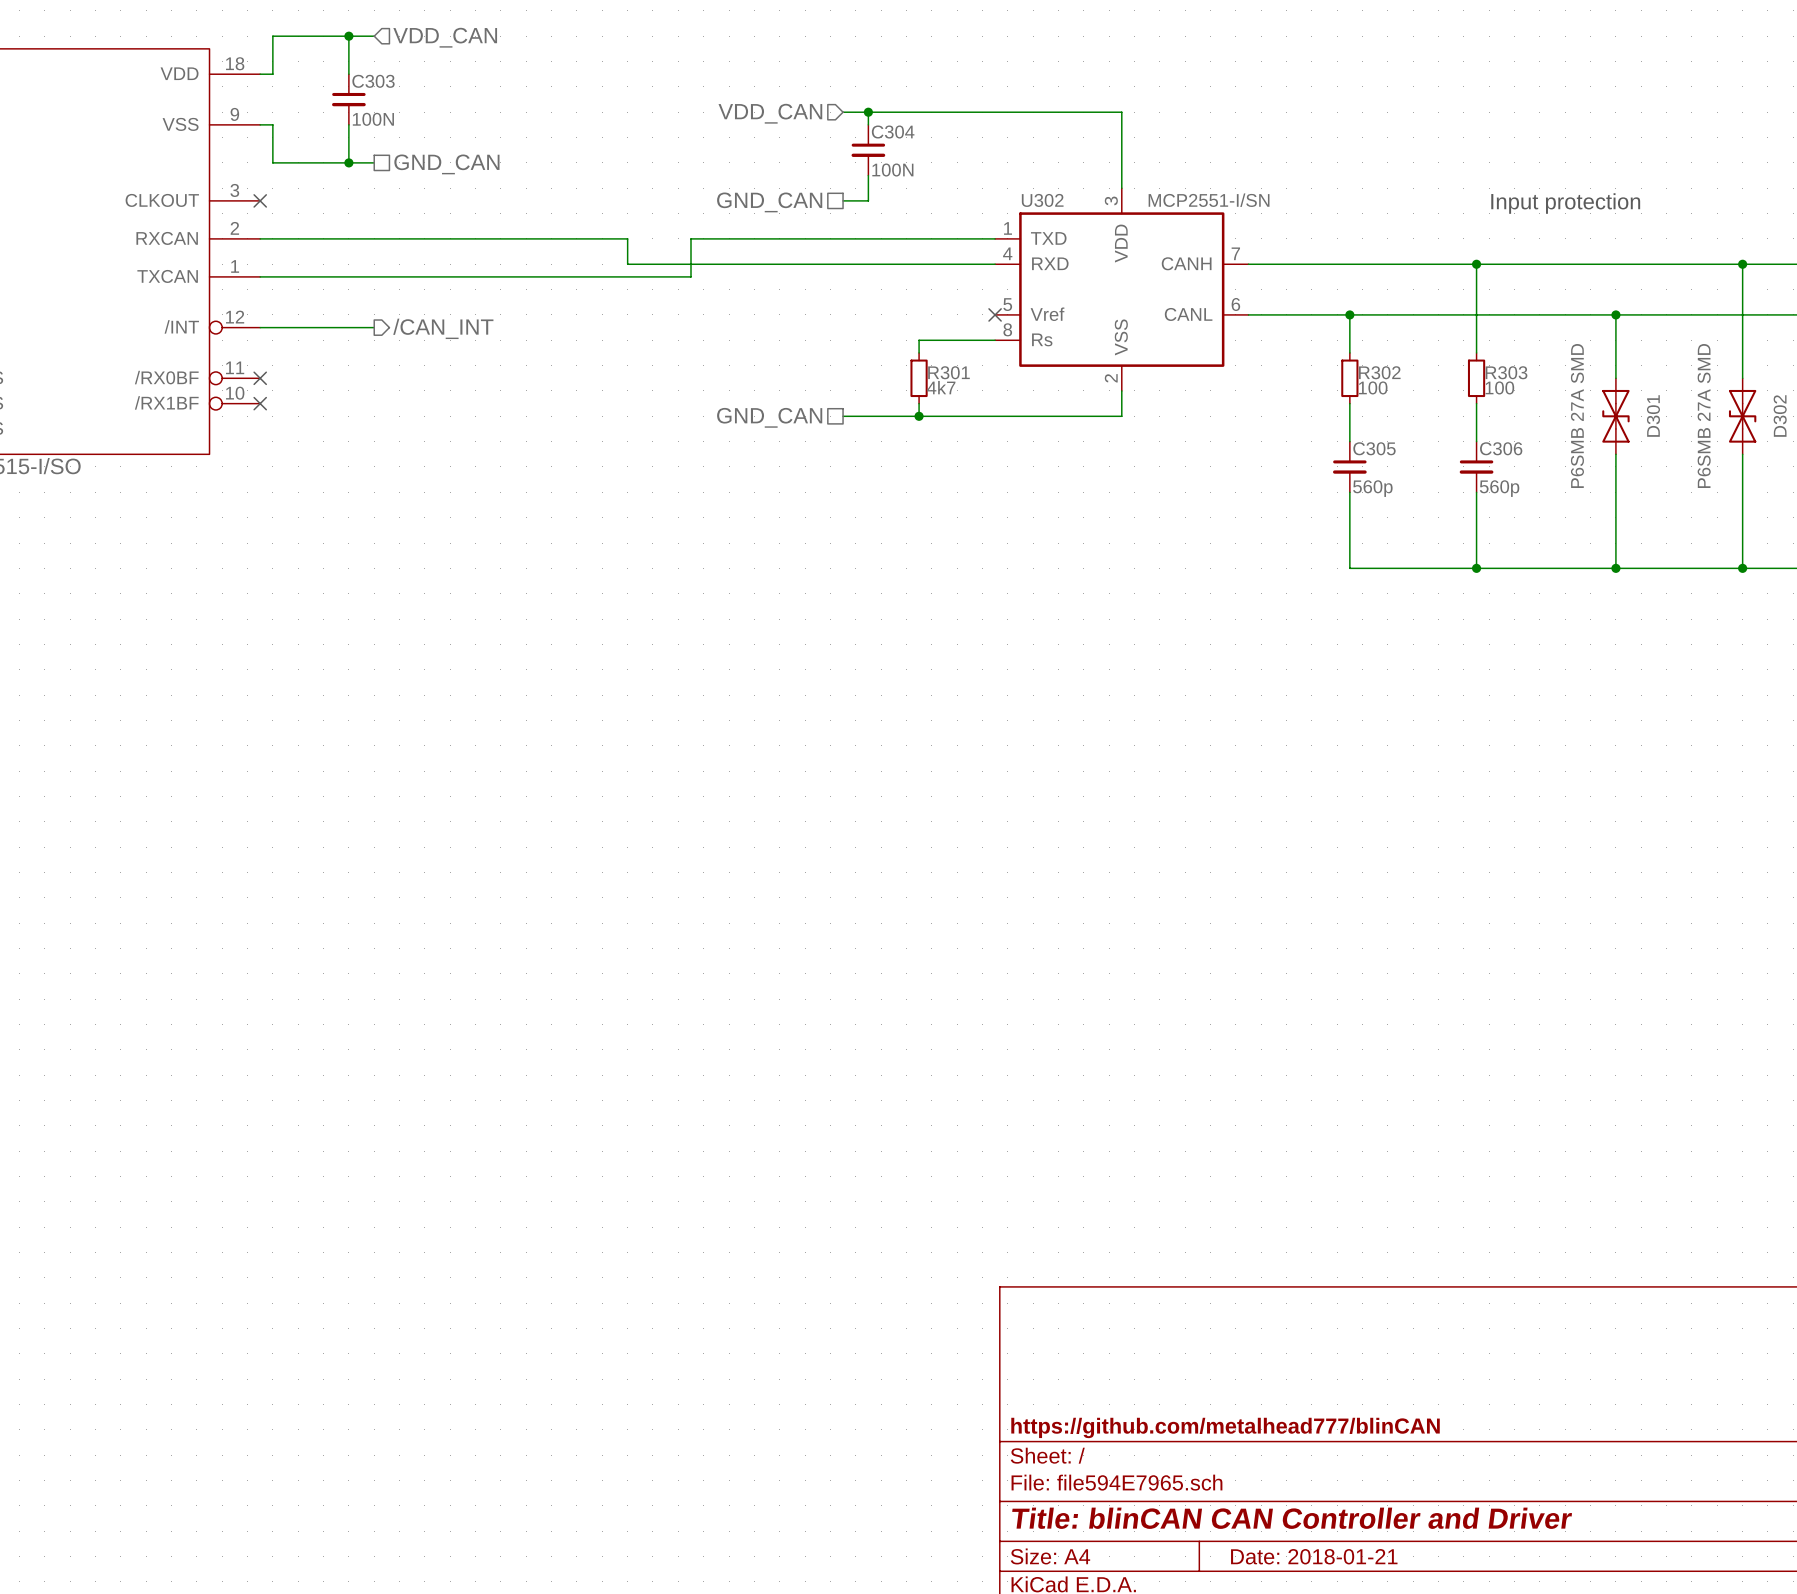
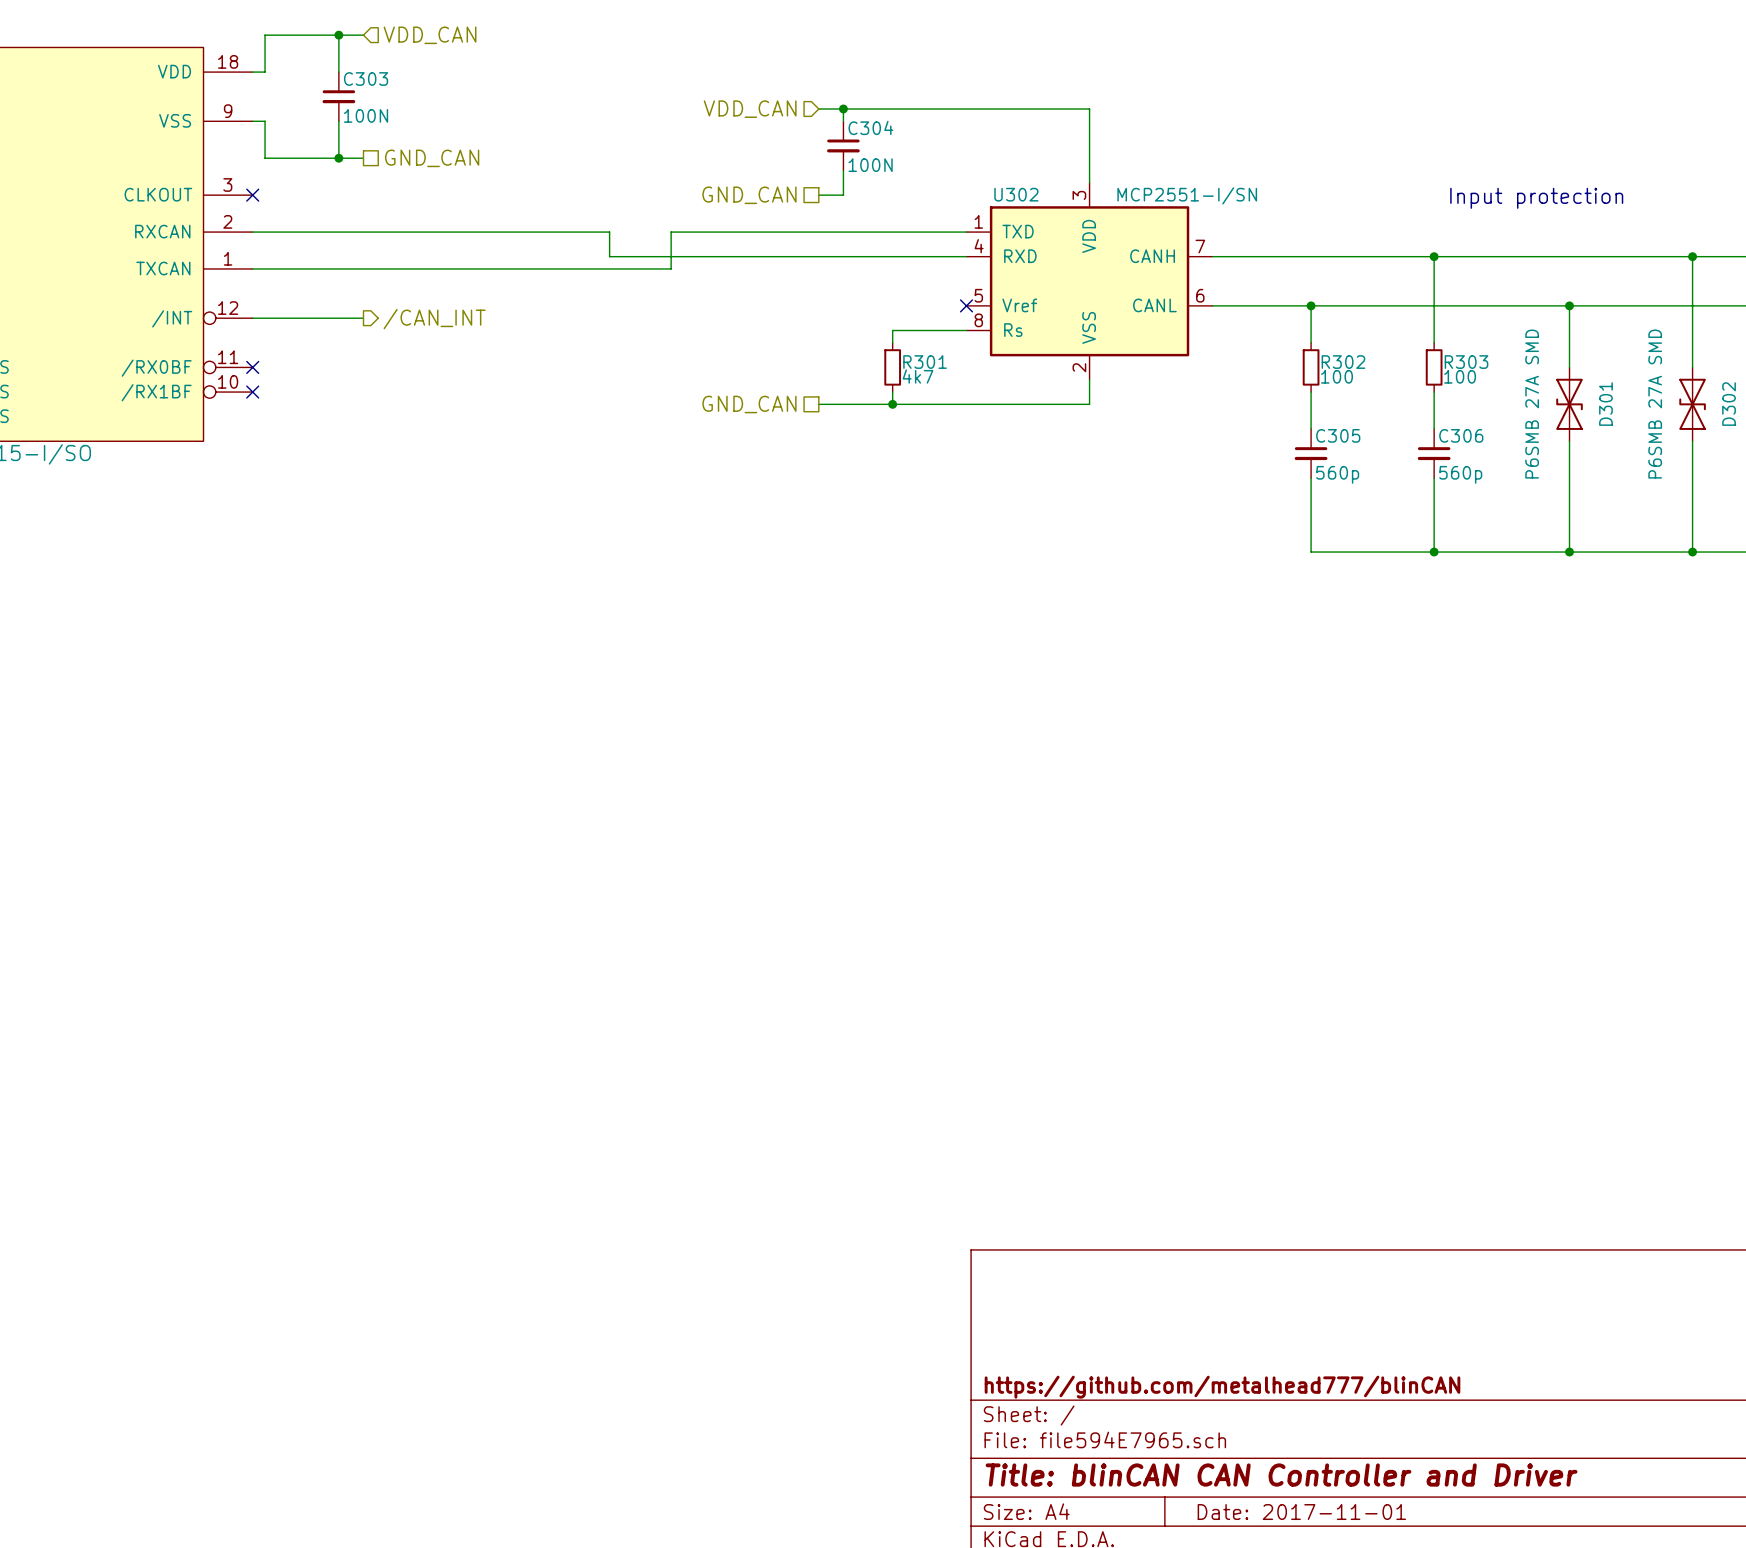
title block: Date: 2018-01-21 (1314, 1556) -> Date: 2017-11-01 (1301, 1512)

